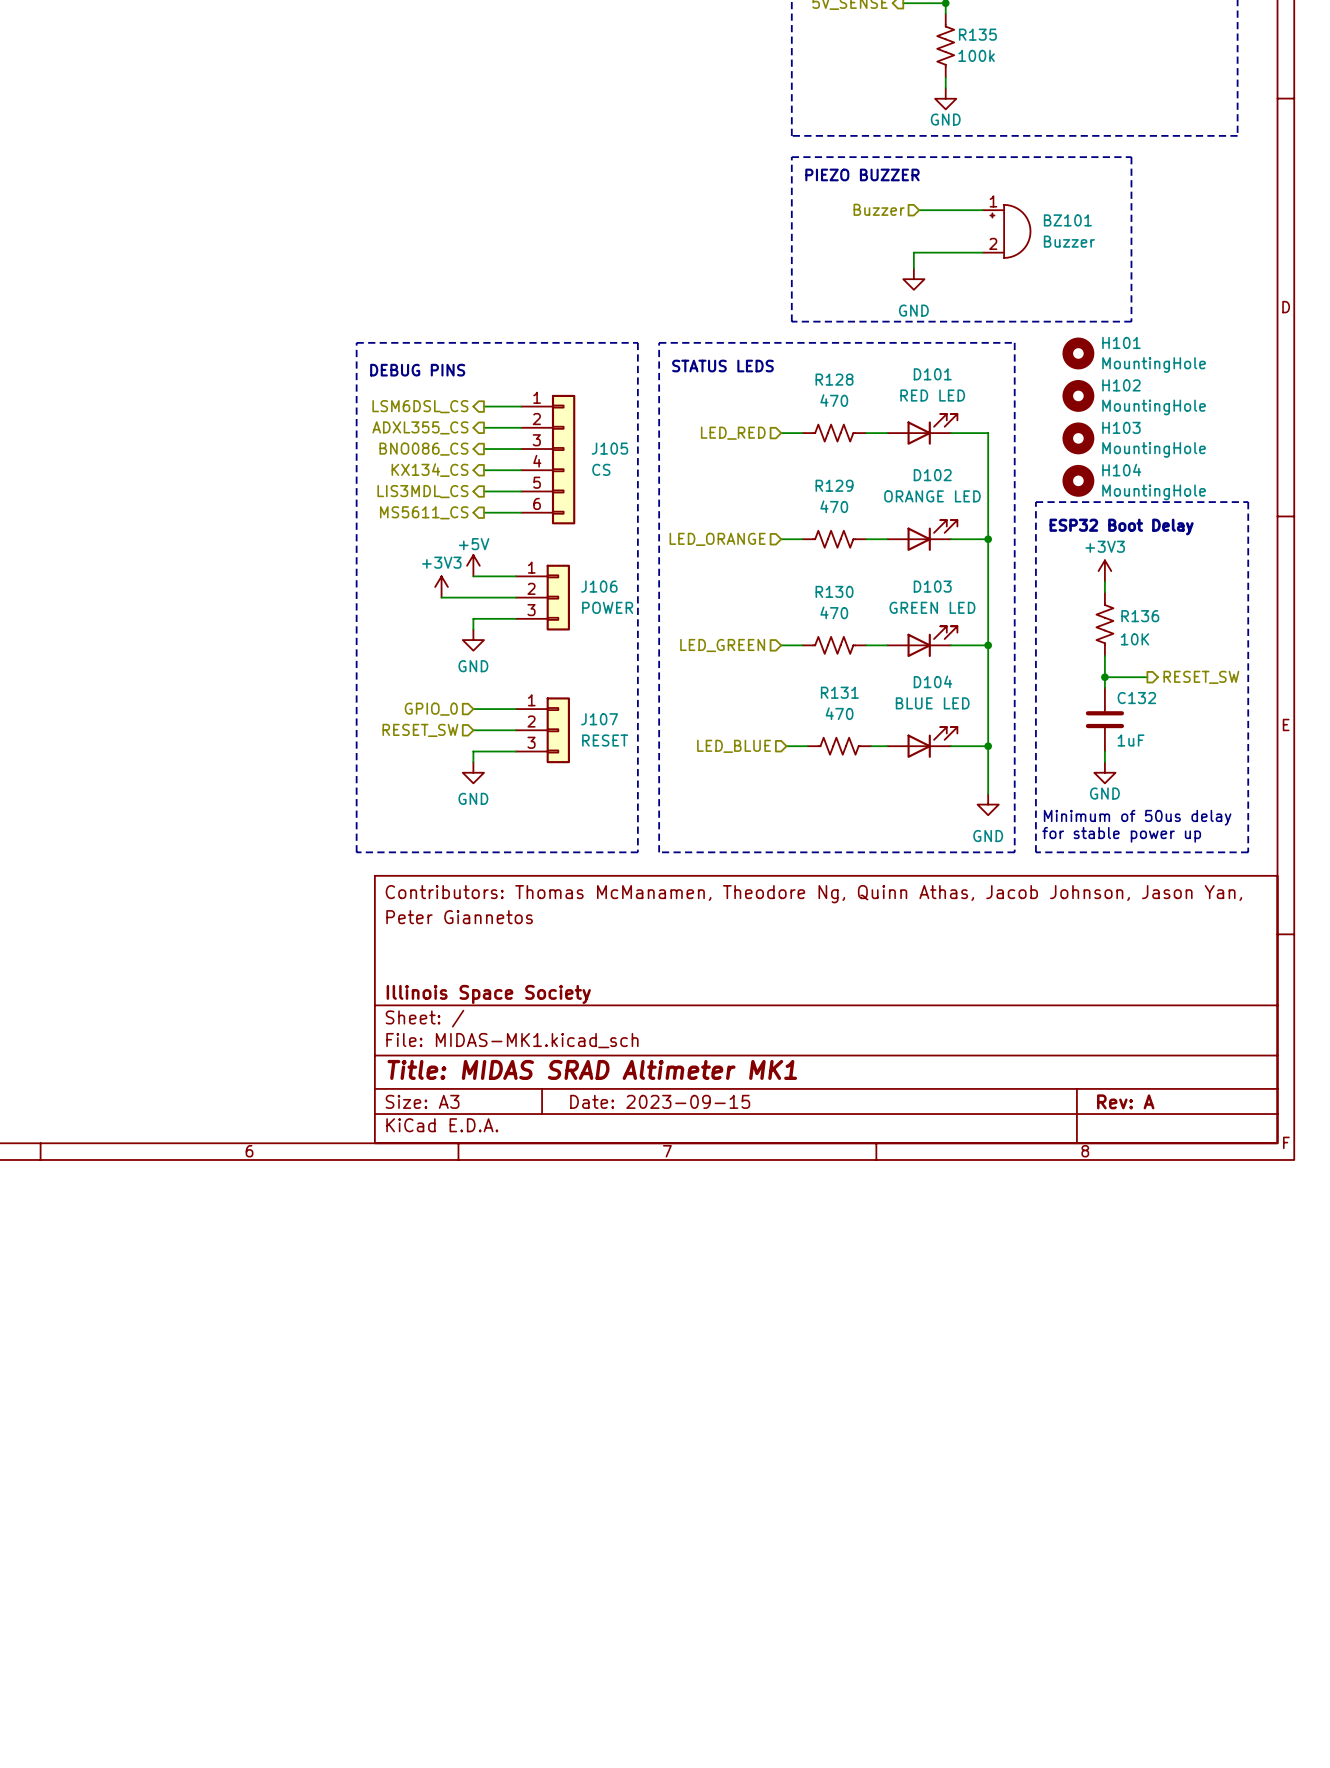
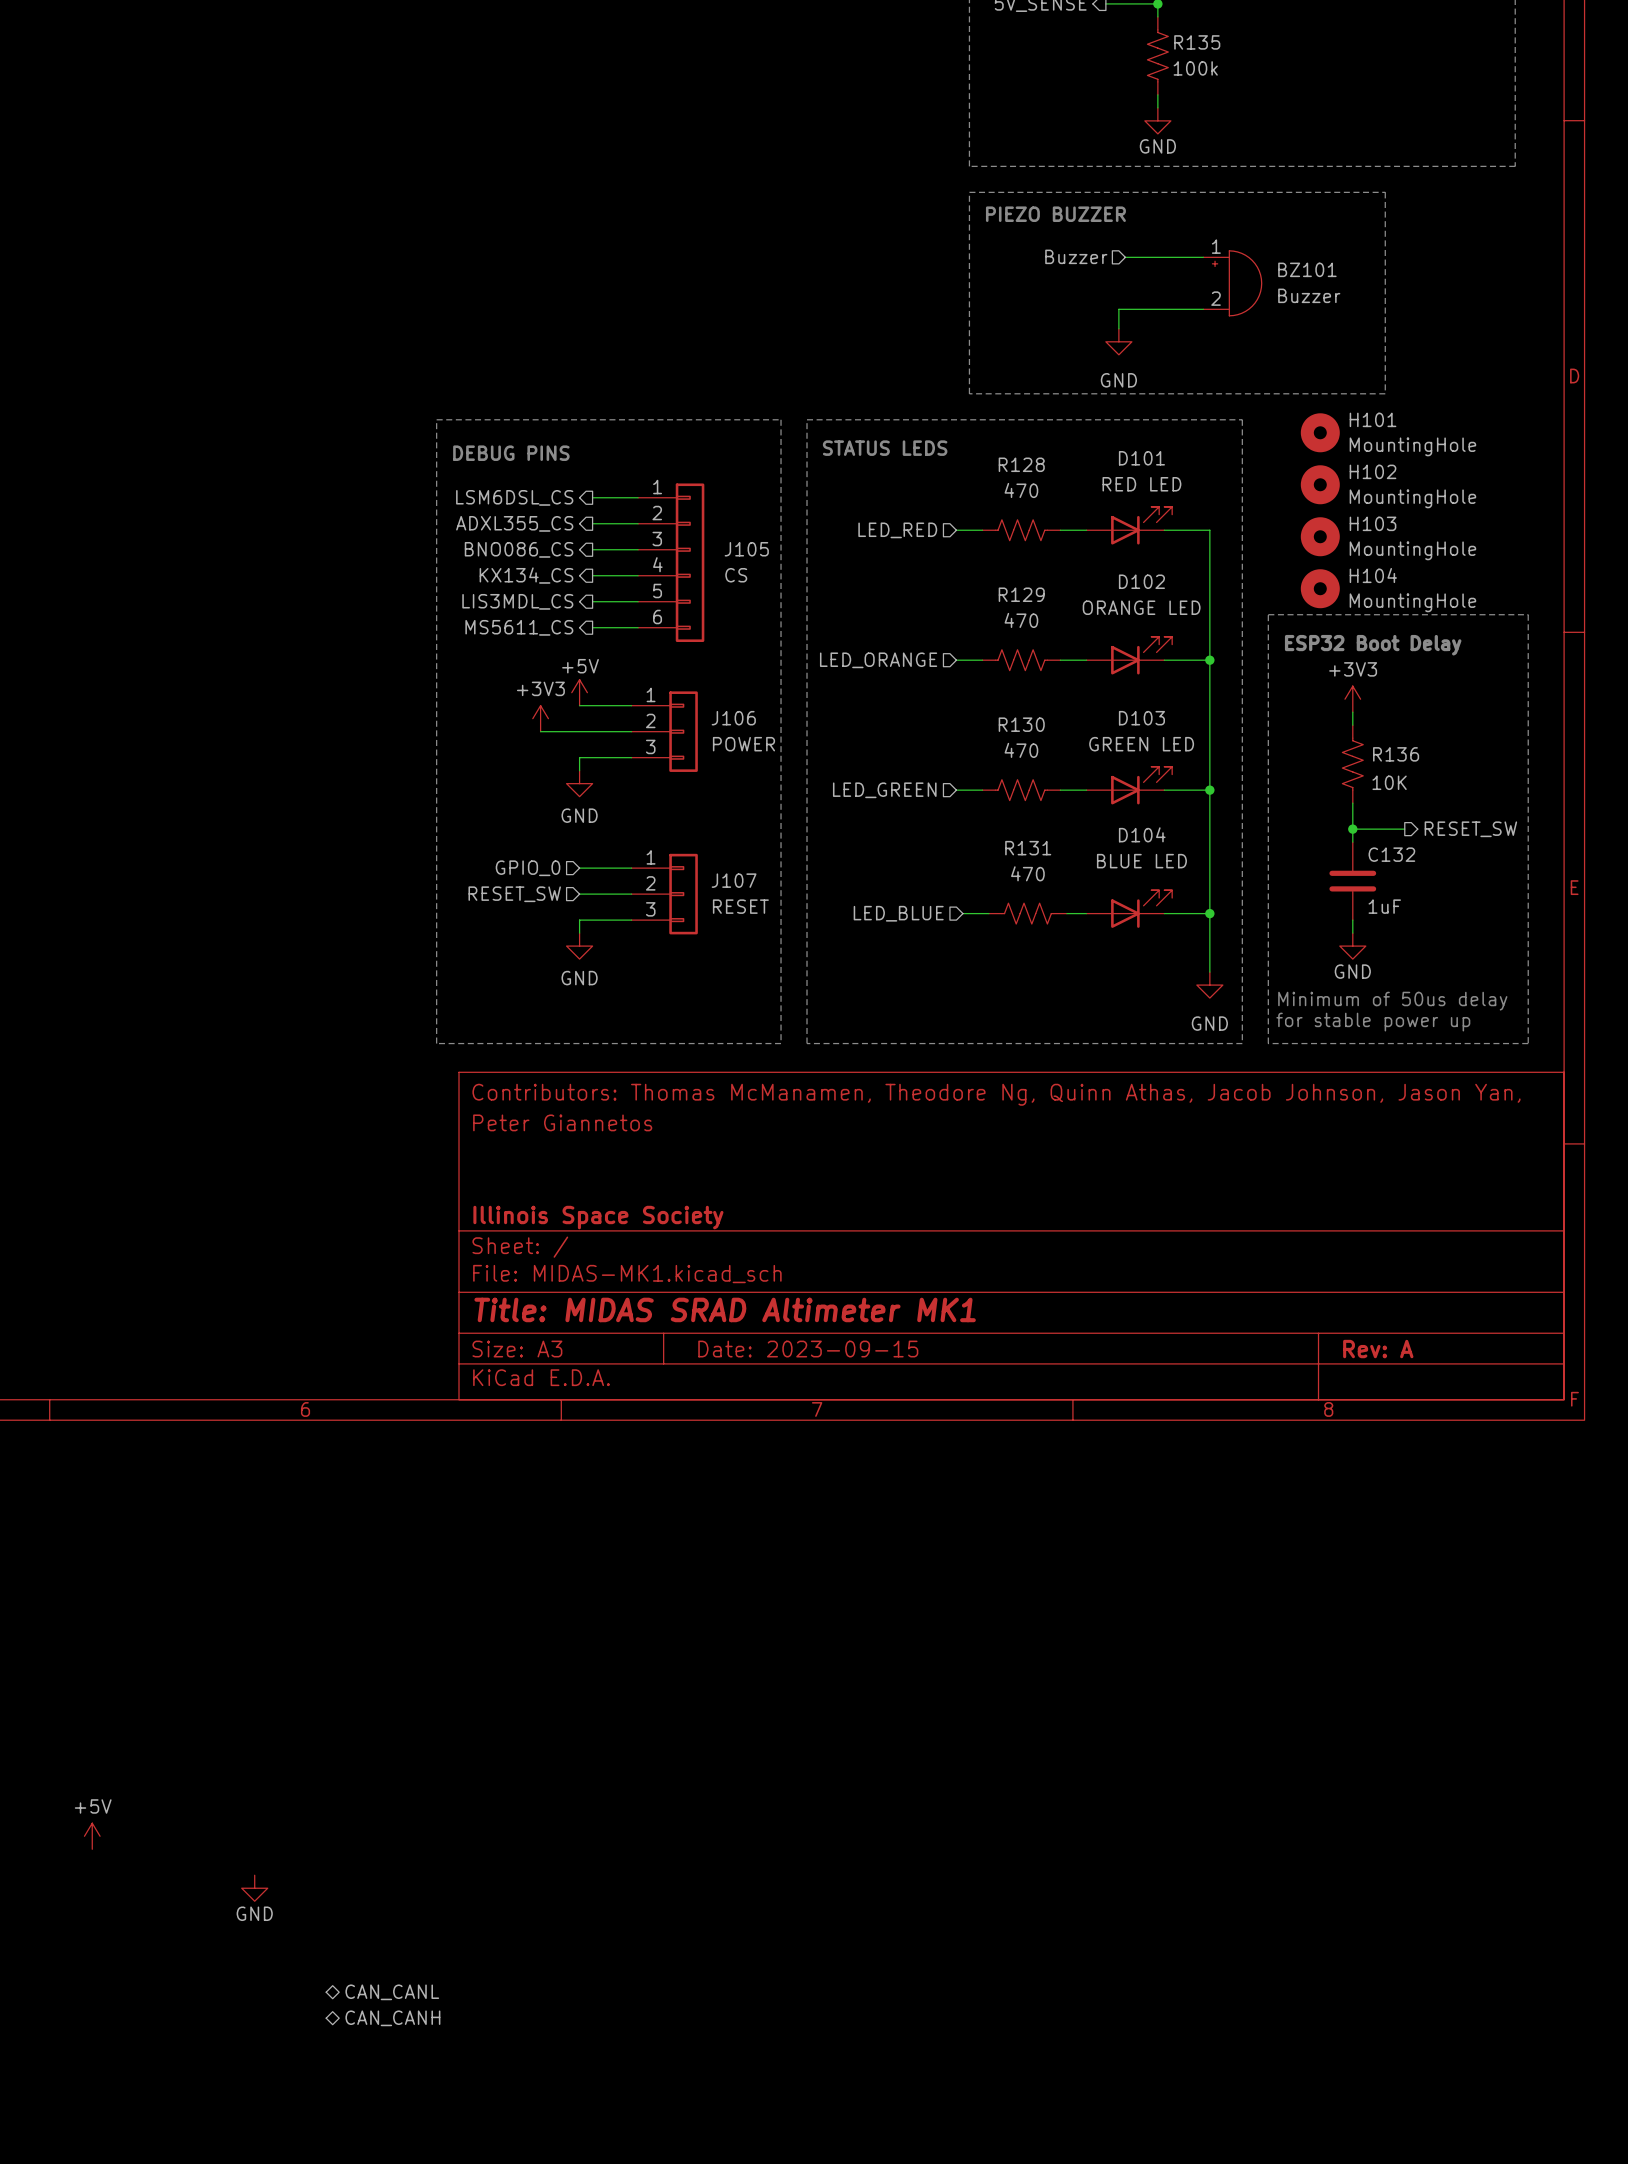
power symbol: none -> +5V (92, 1836)
power symbol: none -> GND (254, 1888)
hierarchical label: none -> CAN_CANL (392, 1992)
hierarchical label: none -> CAN_CANH (392, 2018)

